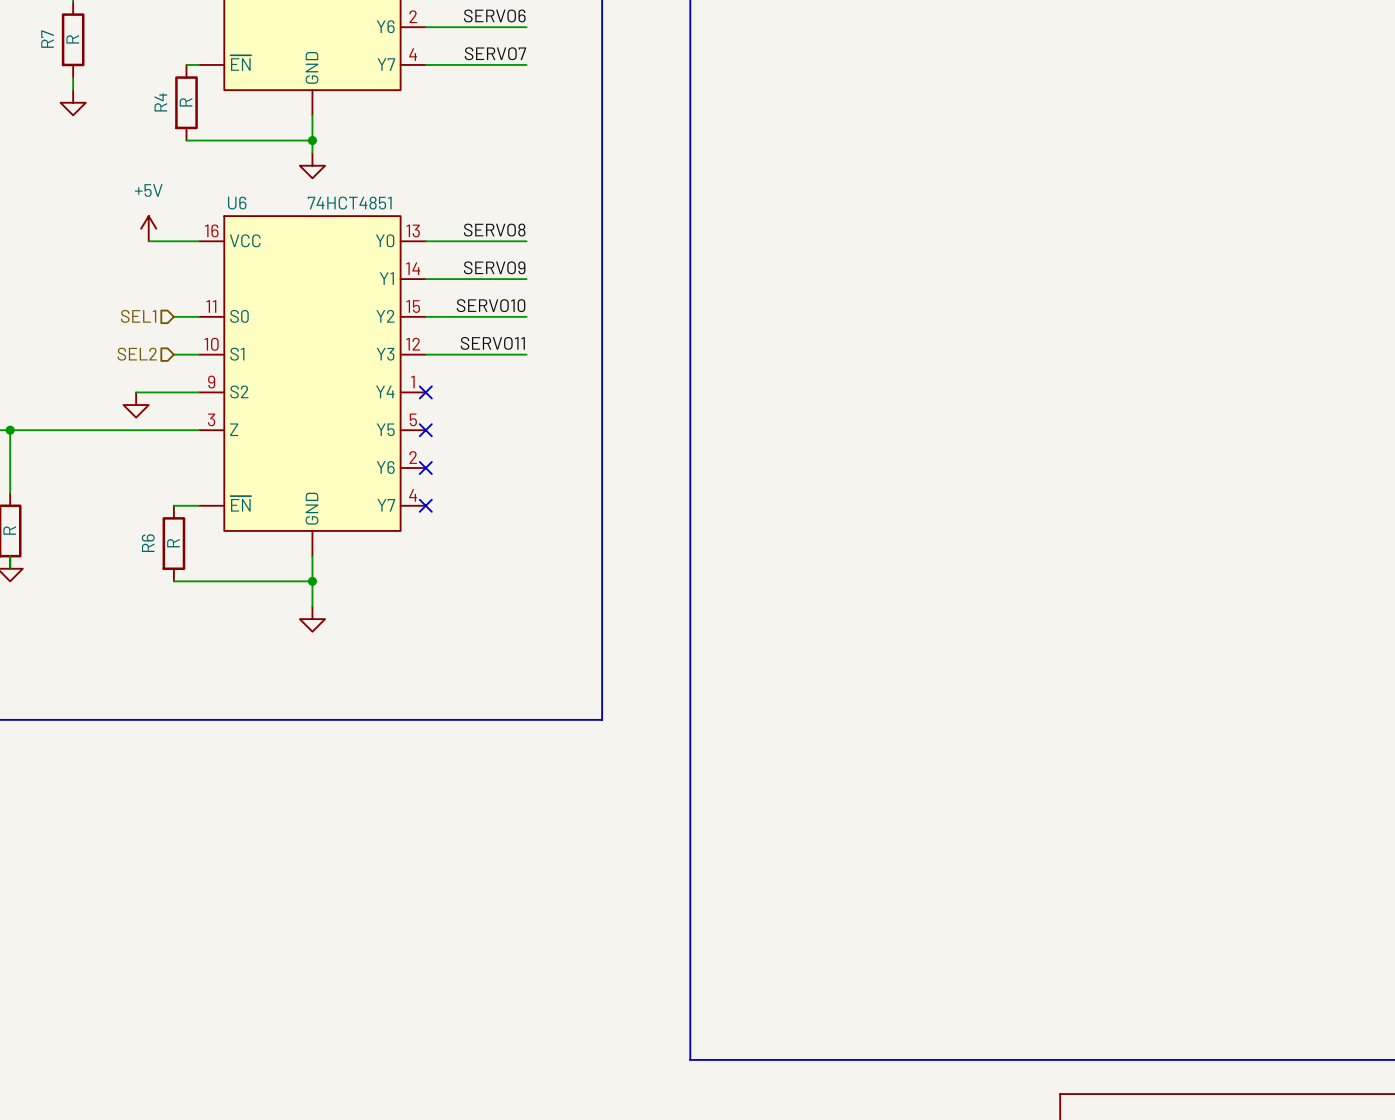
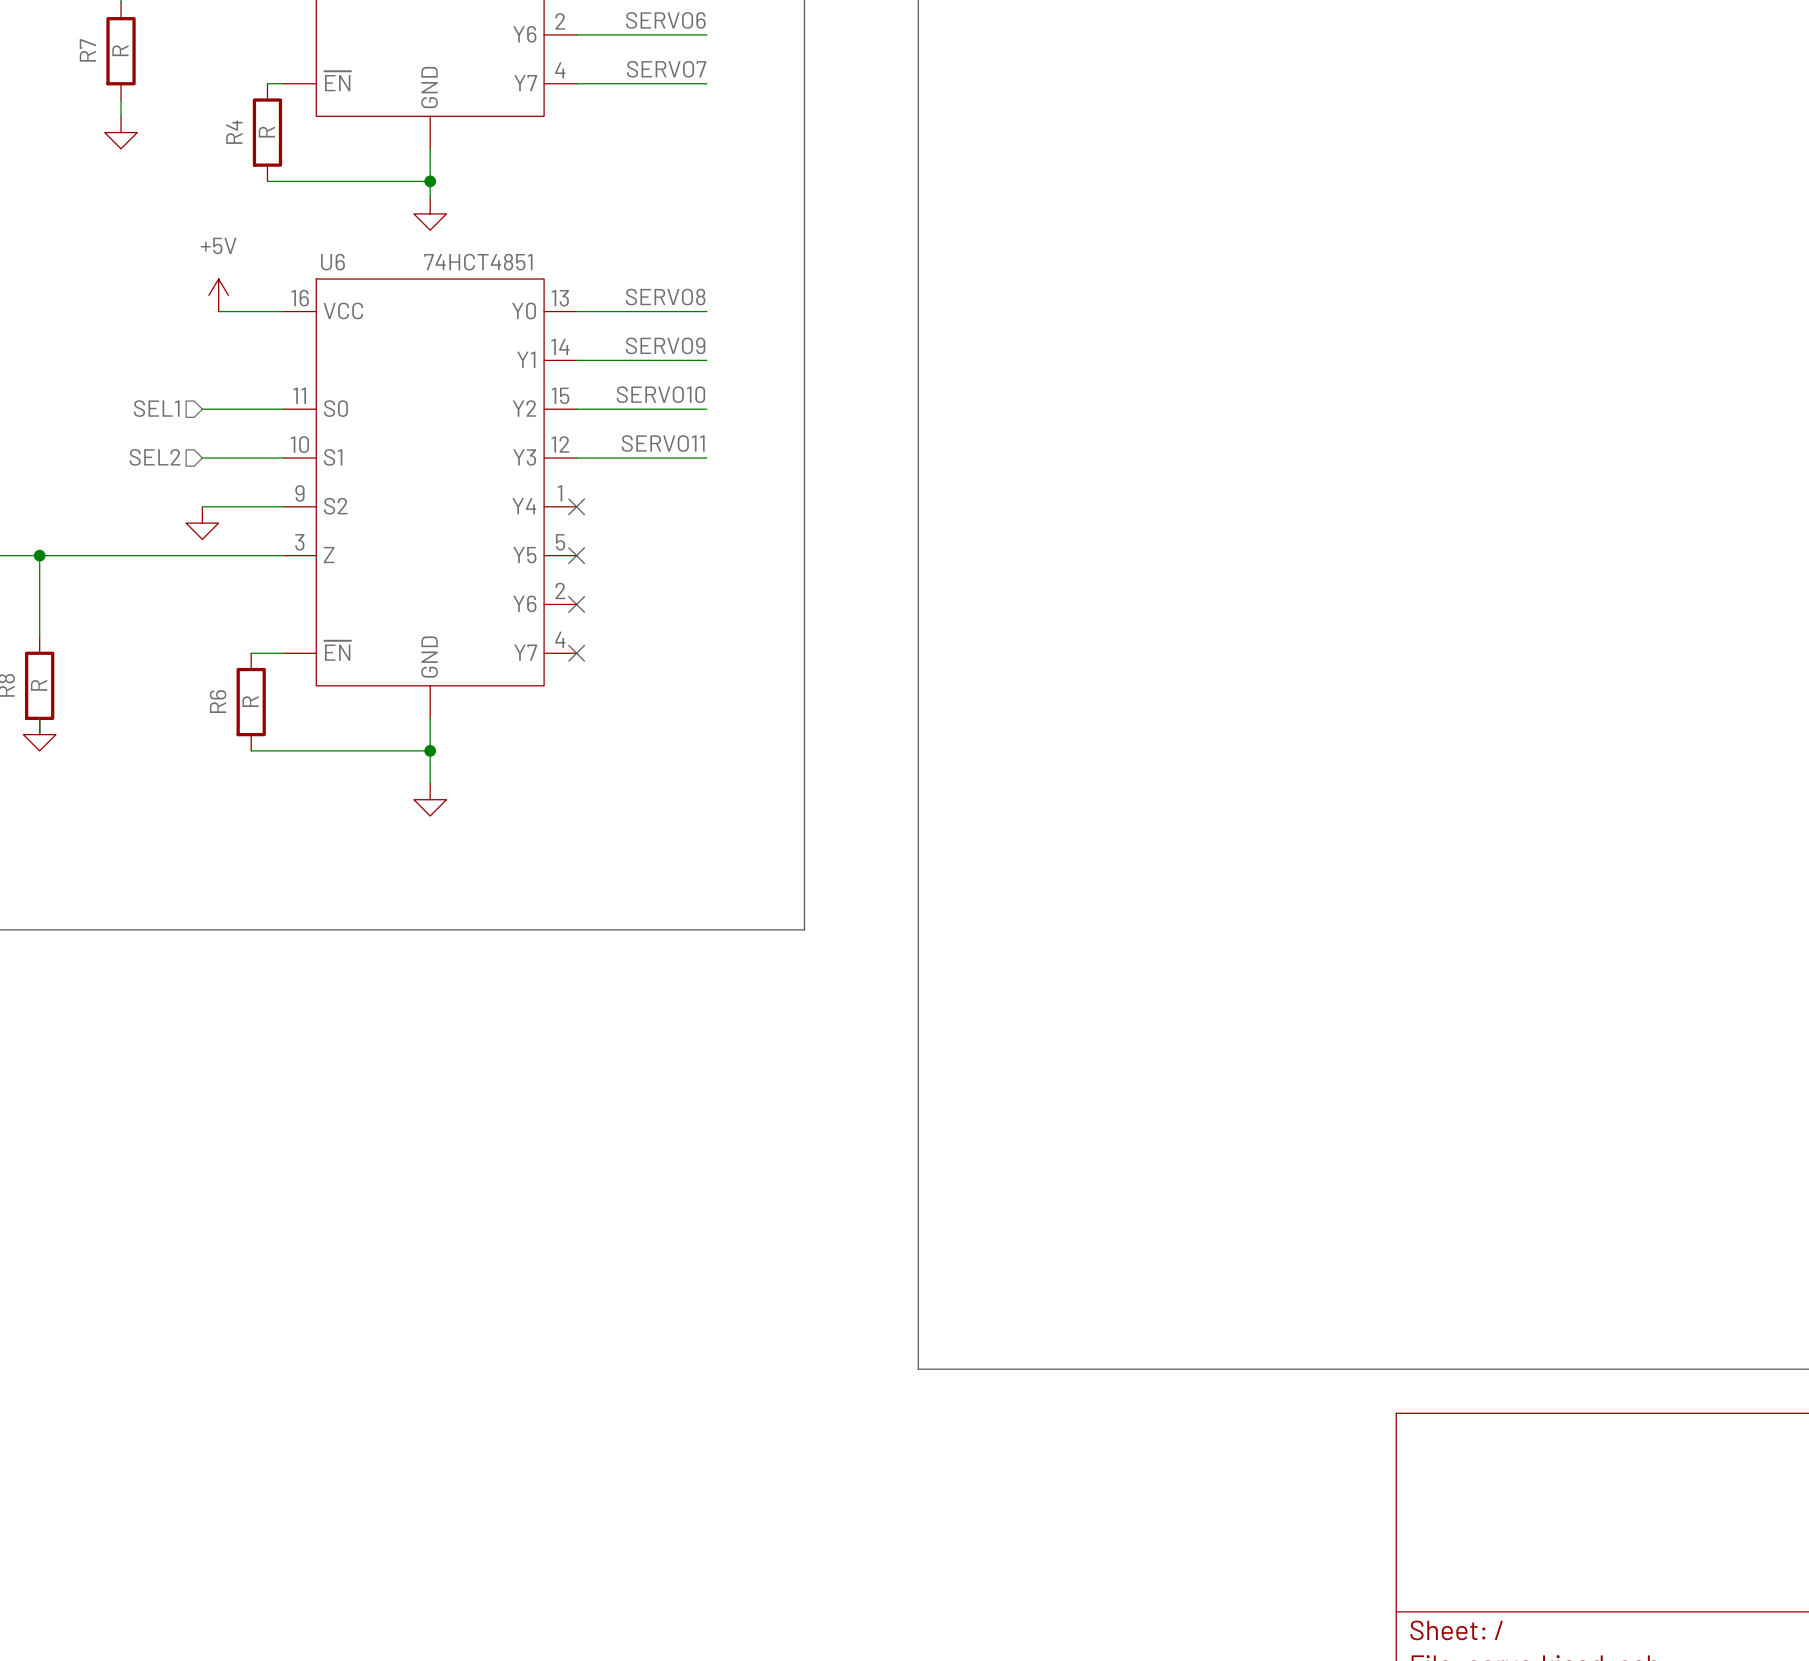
wire: none -> (202, 409) (251, 409)
hierarchical label position: SEL1 (138, 316) -> SEL1 (156, 408)
wire: none -> (202, 458) (251, 458)
hierarchical label position: SEL2 (137, 354) -> SEL2 (155, 457)

